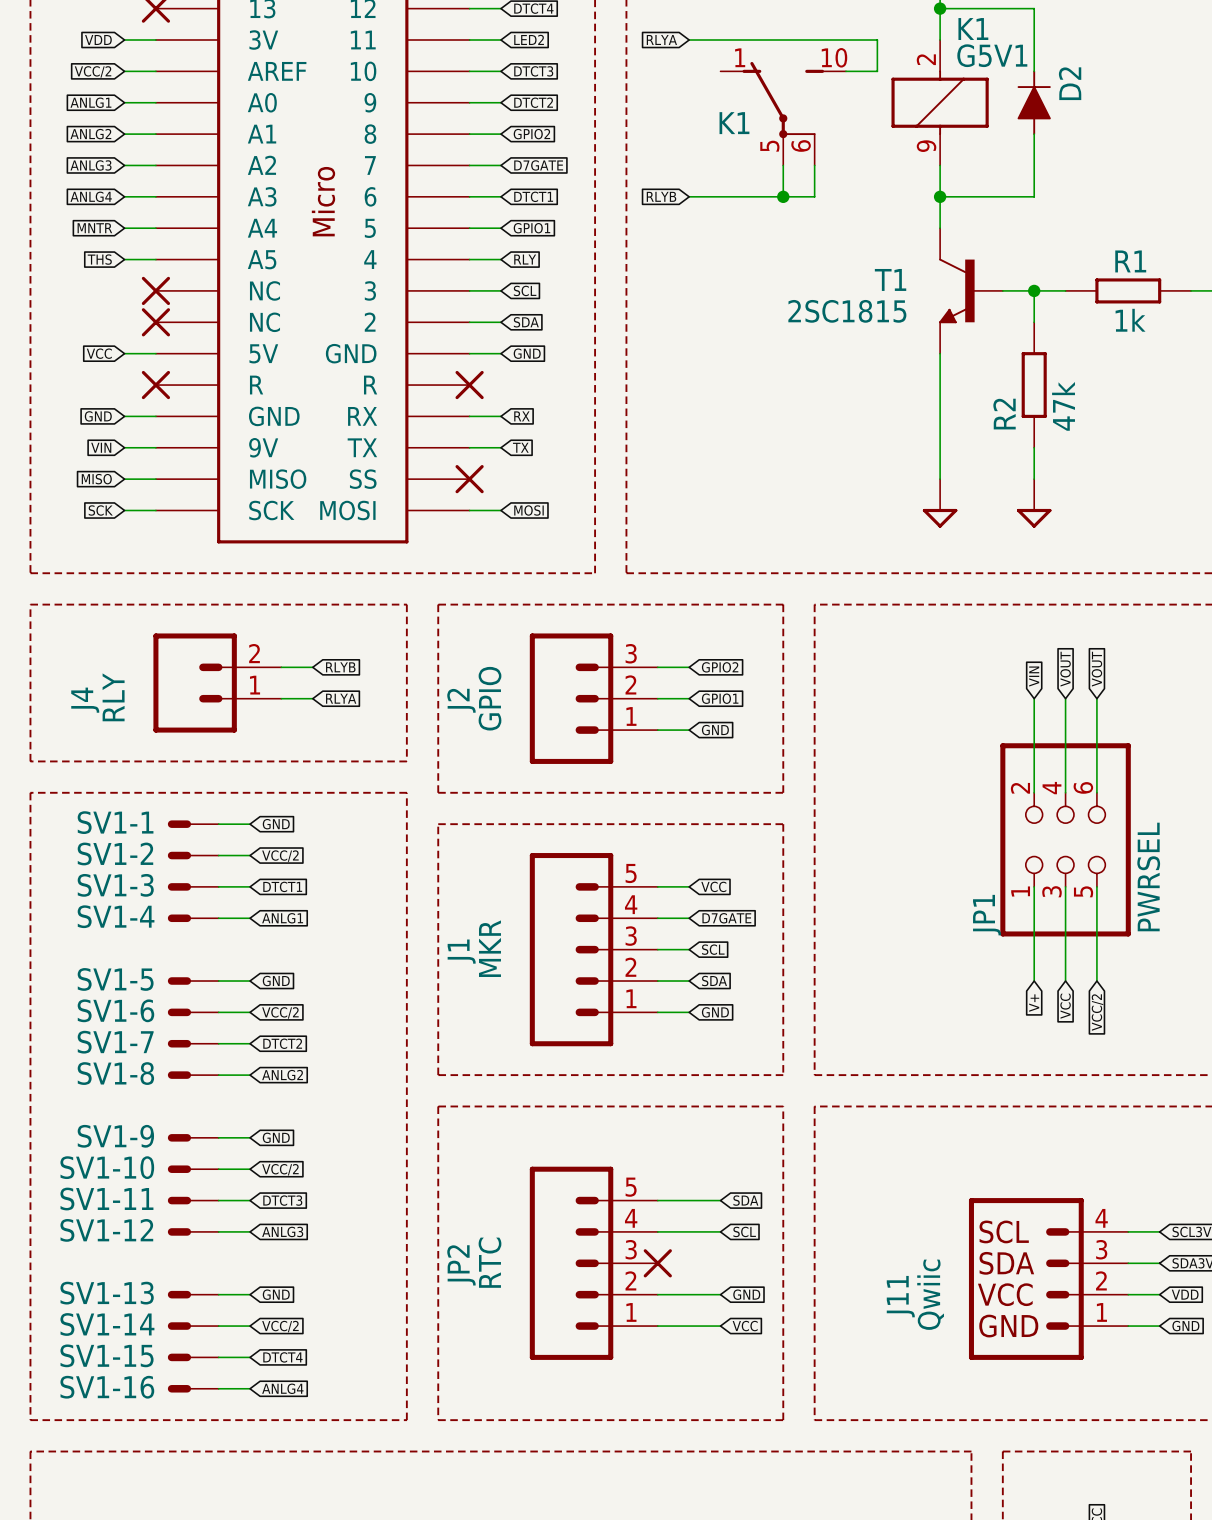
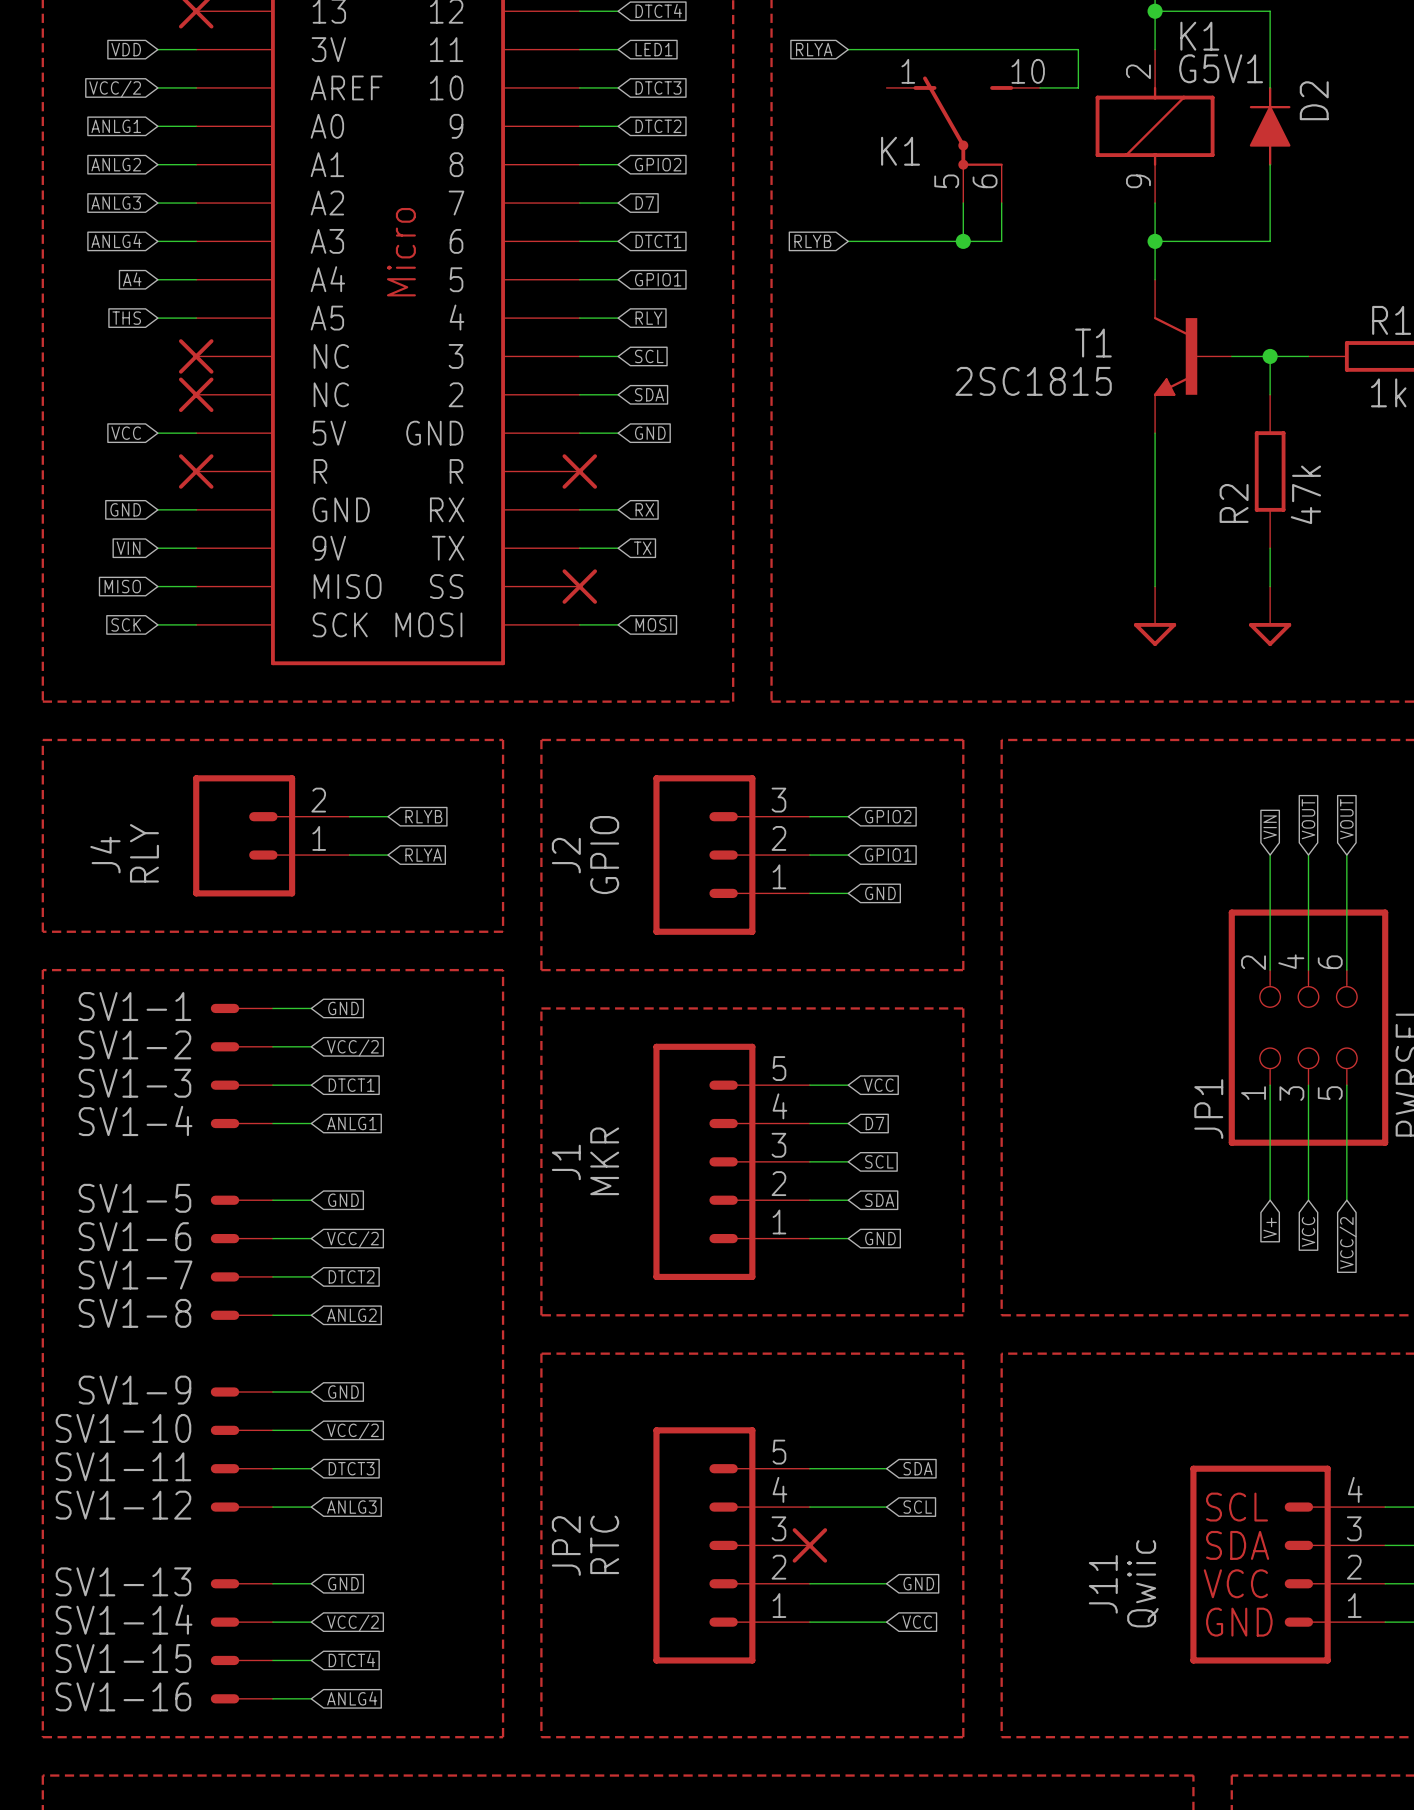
global label: LED2 (529, 39) -> LED1 (654, 49)
global label: D7GATE (538, 165) -> D7 (644, 203)
global label: MNTR (94, 228) -> A4 (132, 279)
global label: D7GATE (726, 918) -> D7 (874, 1123)

